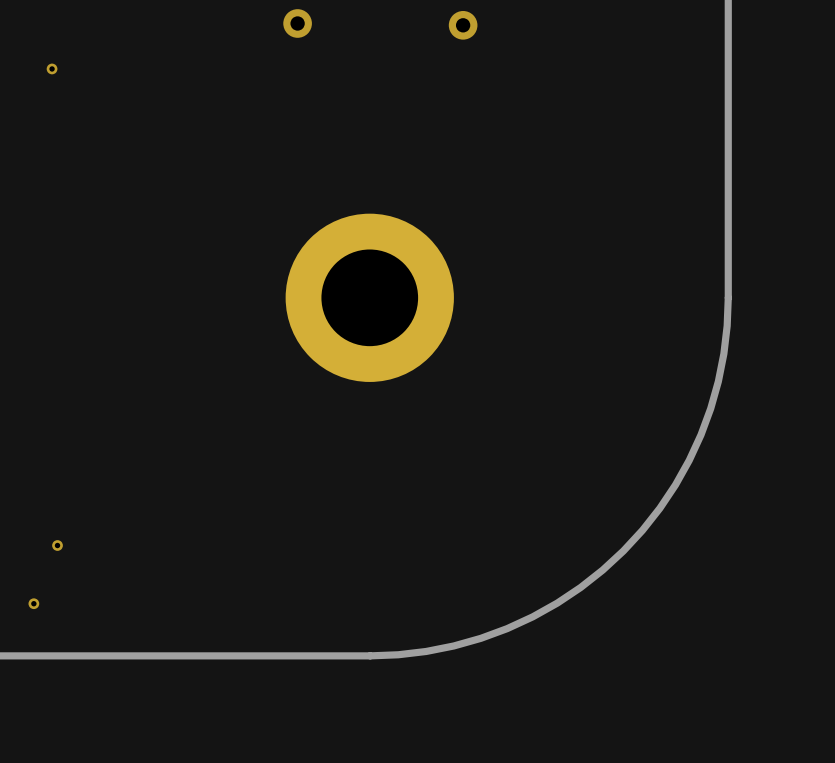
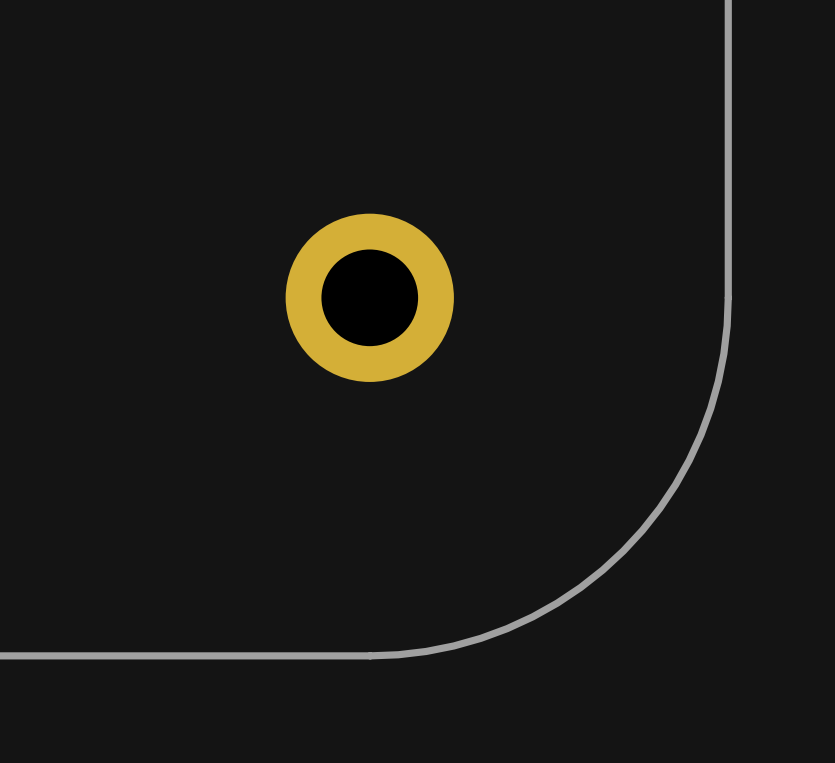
via: (297, 23) -> none
via: (463, 25) -> none
via: (52, 68) -> none
via: (57, 545) -> none
via: (33, 603) -> none

